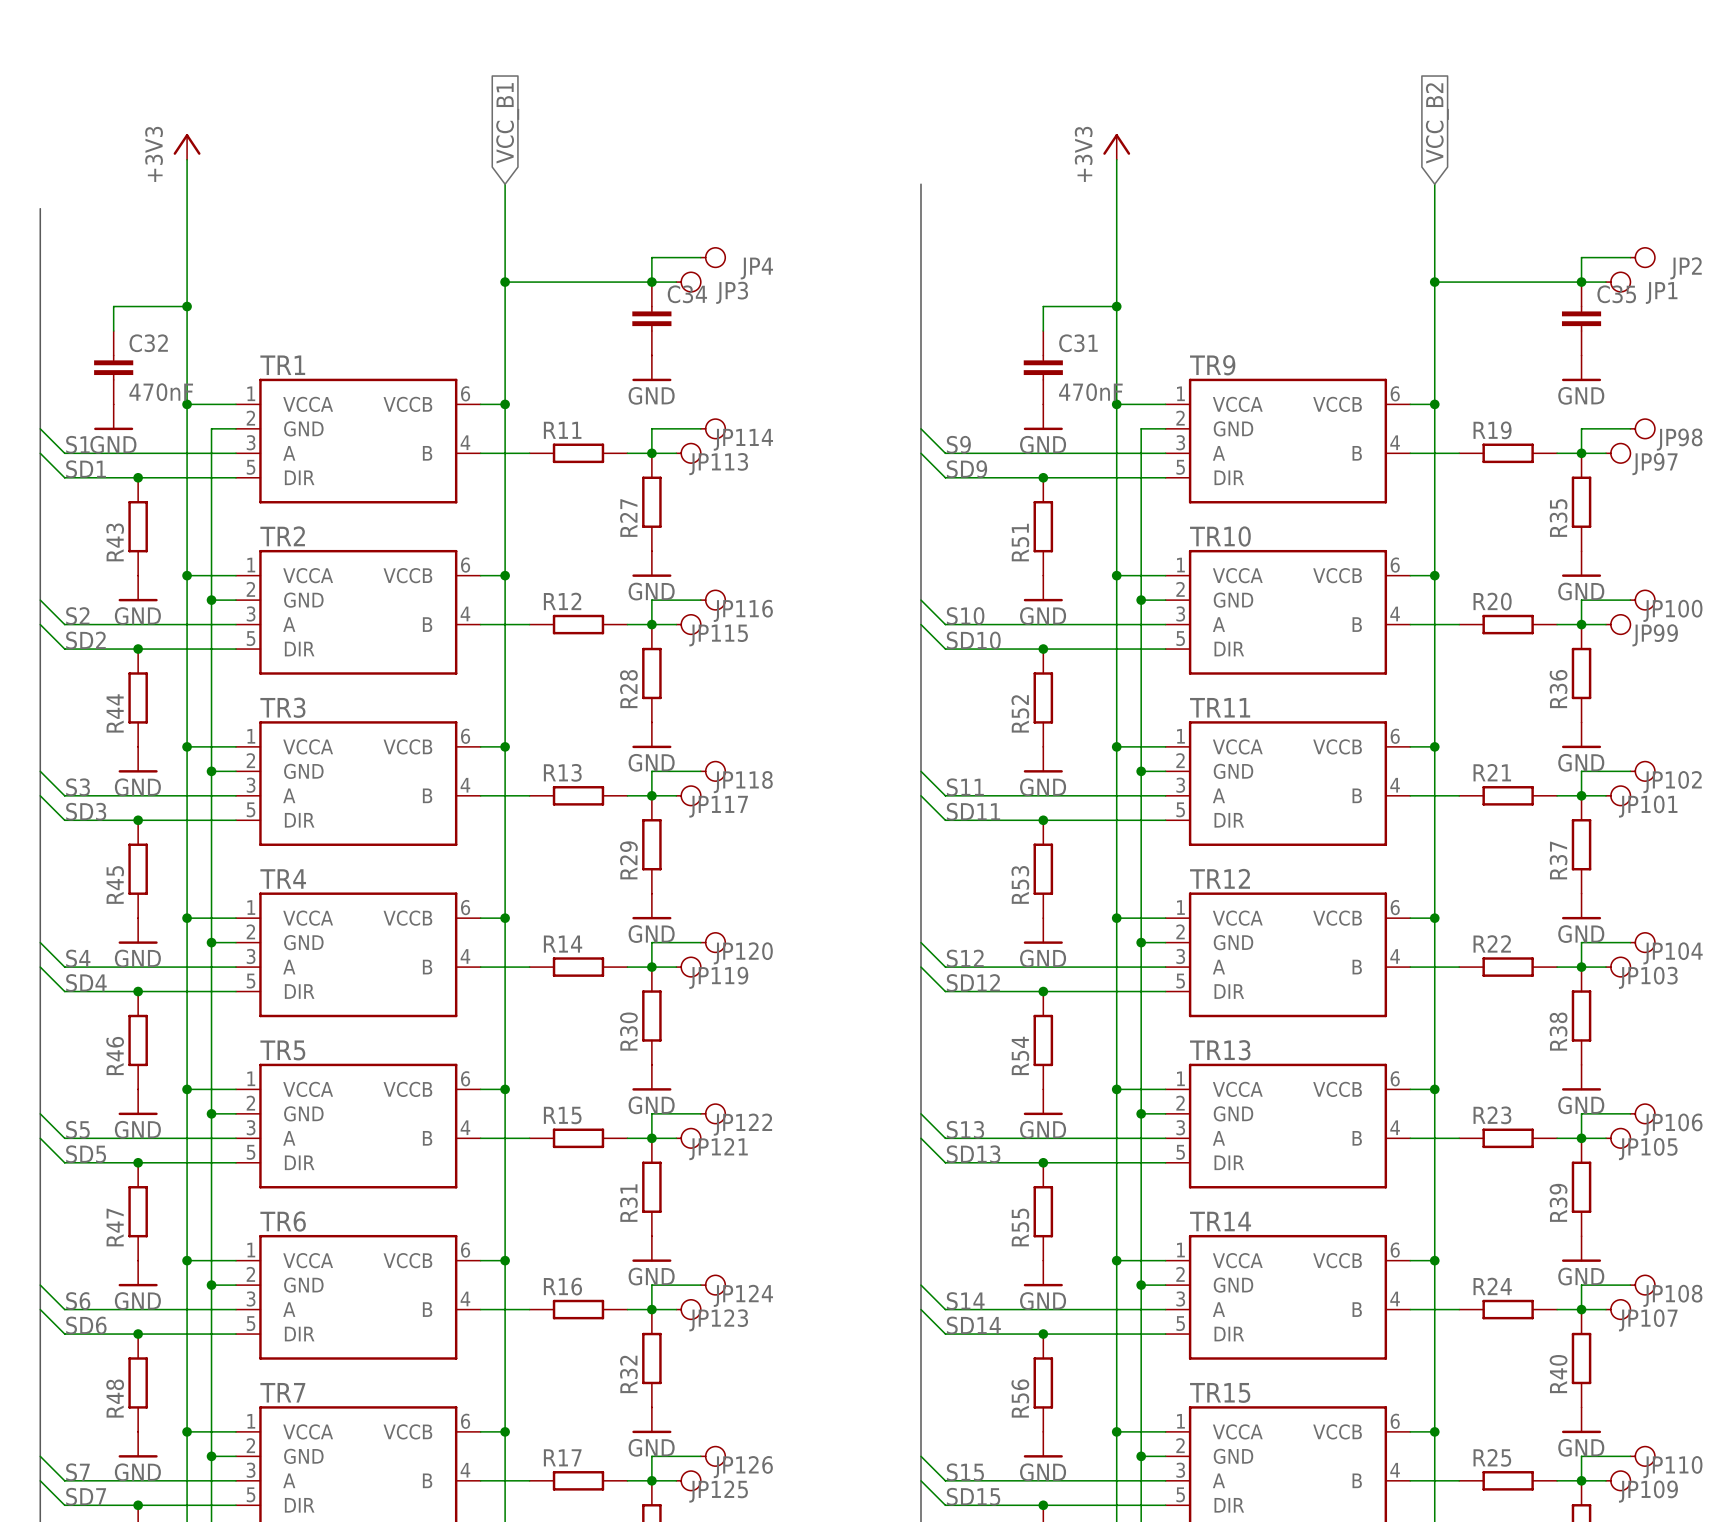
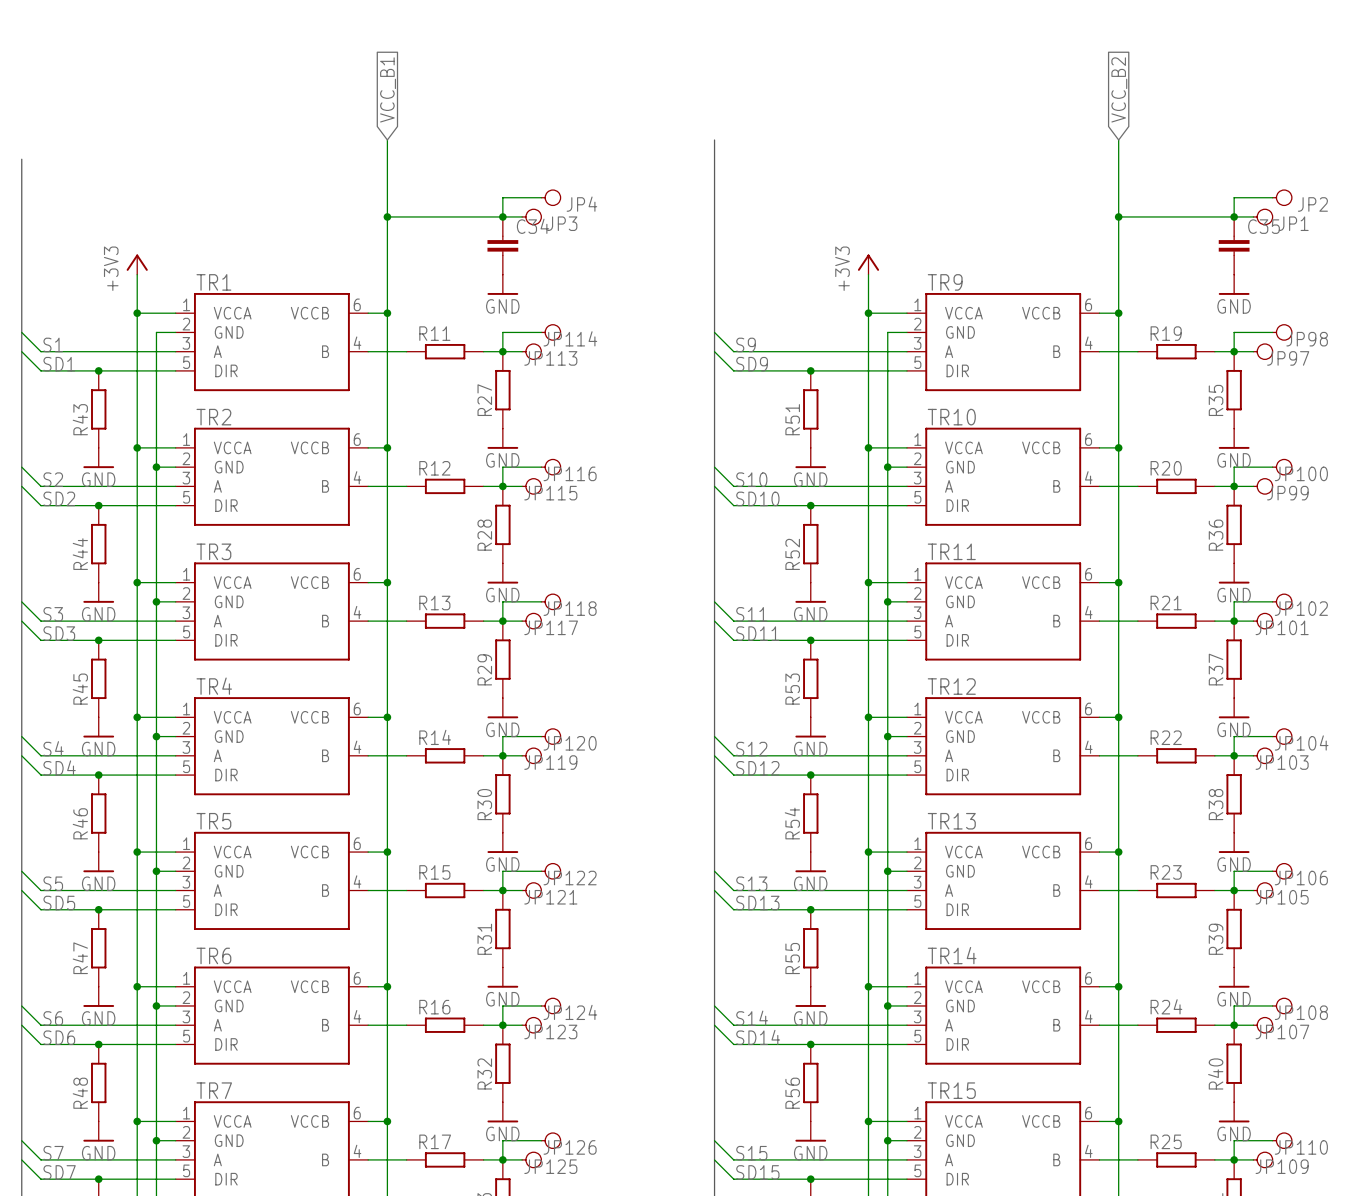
power symbol position: +3V3 (187, 146) -> +3V3 (137, 264)
power symbol position: +3V3 (1116, 146) -> +3V3 (868, 264)
wire: (187, 159) (187, 355) -> none
wire: (1116, 159) (1116, 355) -> none
wire: (187, 306) (113, 306) (113, 330) -> none
junction: (187, 306) -> none
wire: (1116, 306) (1043, 306) (1043, 330) -> none
junction: (1116, 306) -> none
C32: 470nF (113, 367) -> none
C31: 470nF (1043, 367) -> none
power symbol: GND (113, 417) -> none
power symbol: GND (1043, 417) -> none

